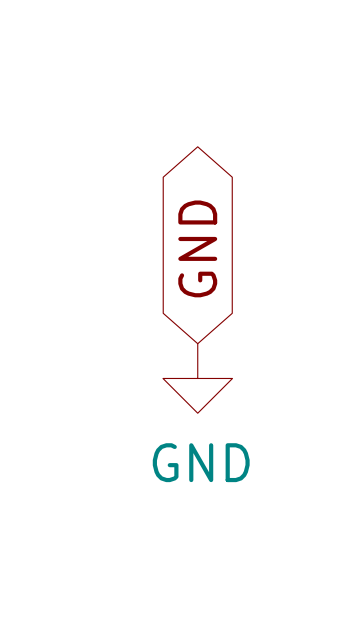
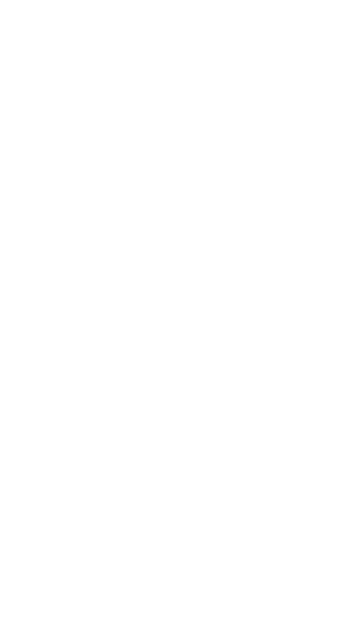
global label: GND (197, 248) -> none
power symbol: GND (197, 378) -> none

